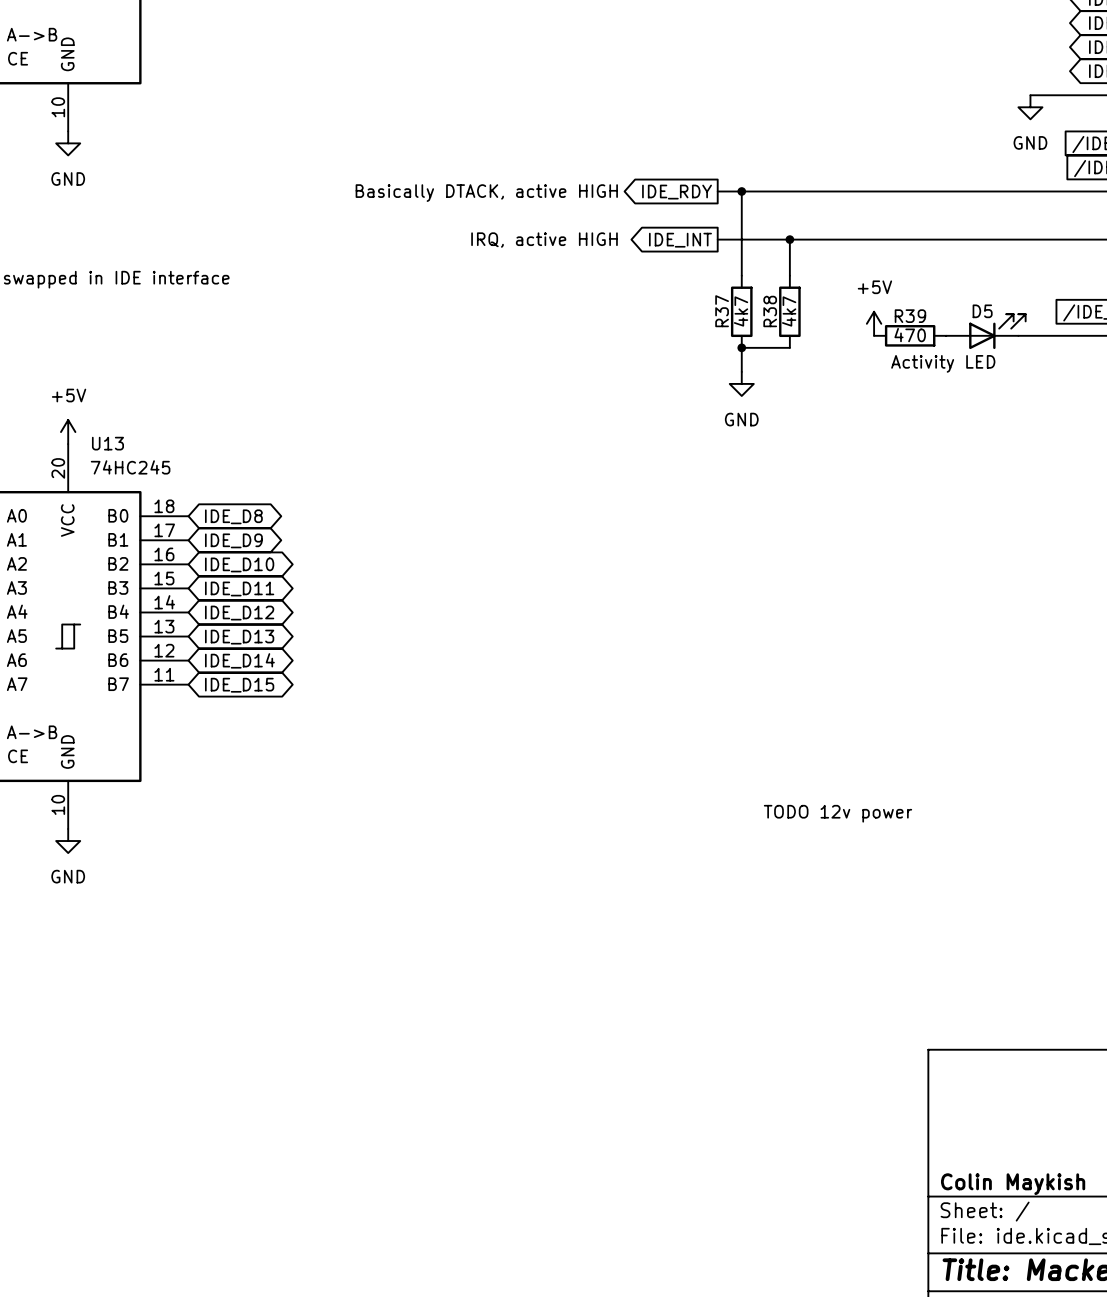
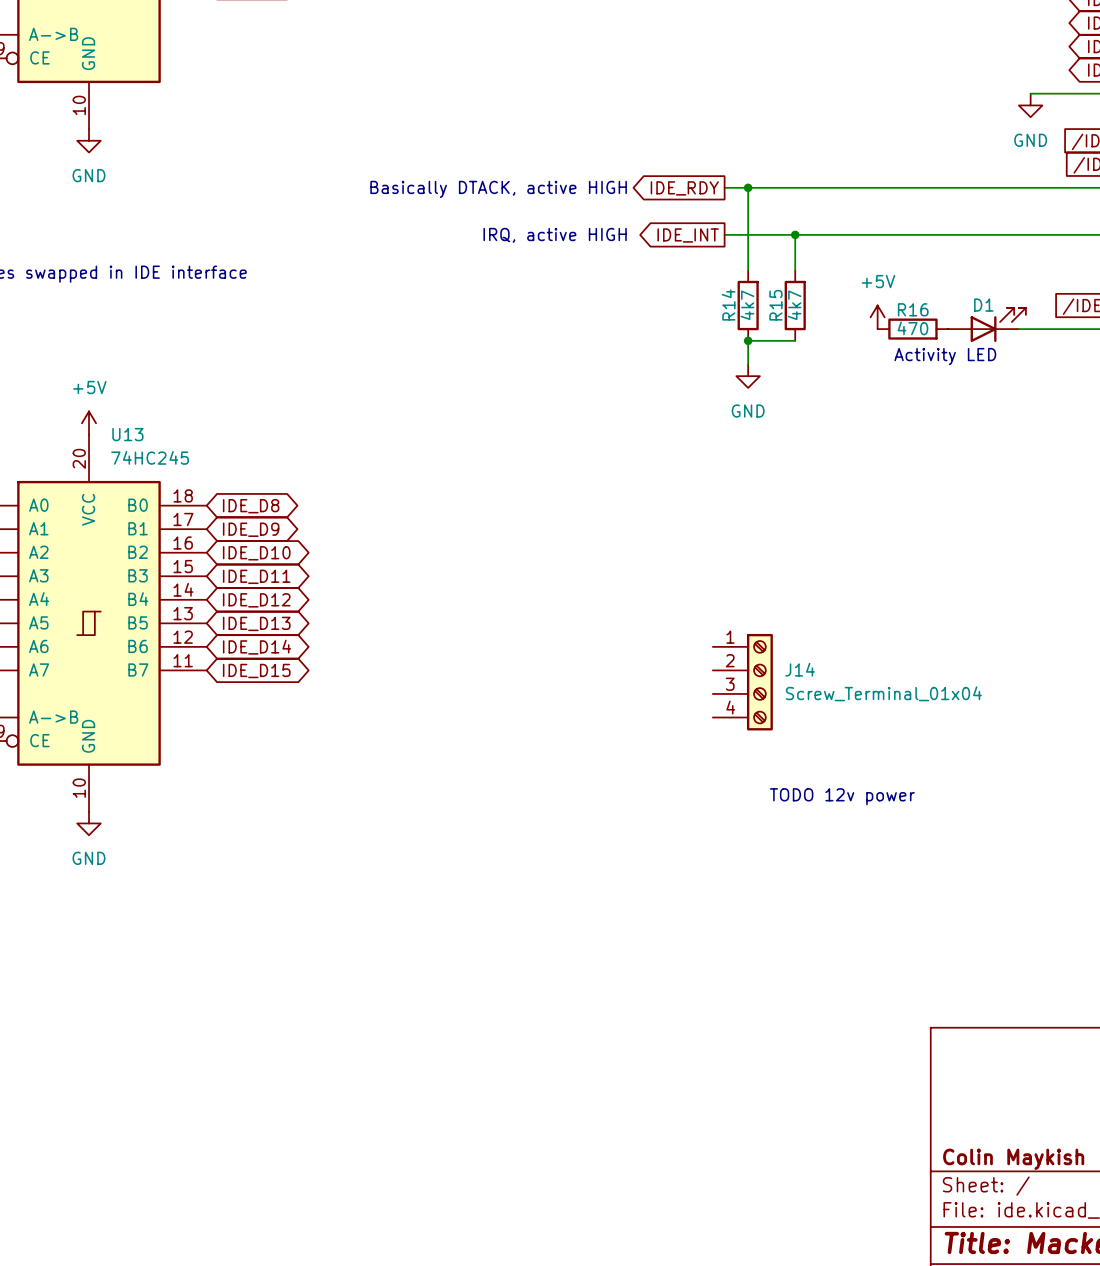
R37 name: R37 (722, 311) -> R14 (728, 304)
R38 name: R38 (770, 311) -> R15 (775, 305)
D5 name: D5 (982, 311) -> D1 (983, 305)
R39 name: R39 (910, 316) -> R16 (913, 309)
J14: none -> Screw_Terminal_01x04 (742, 682)

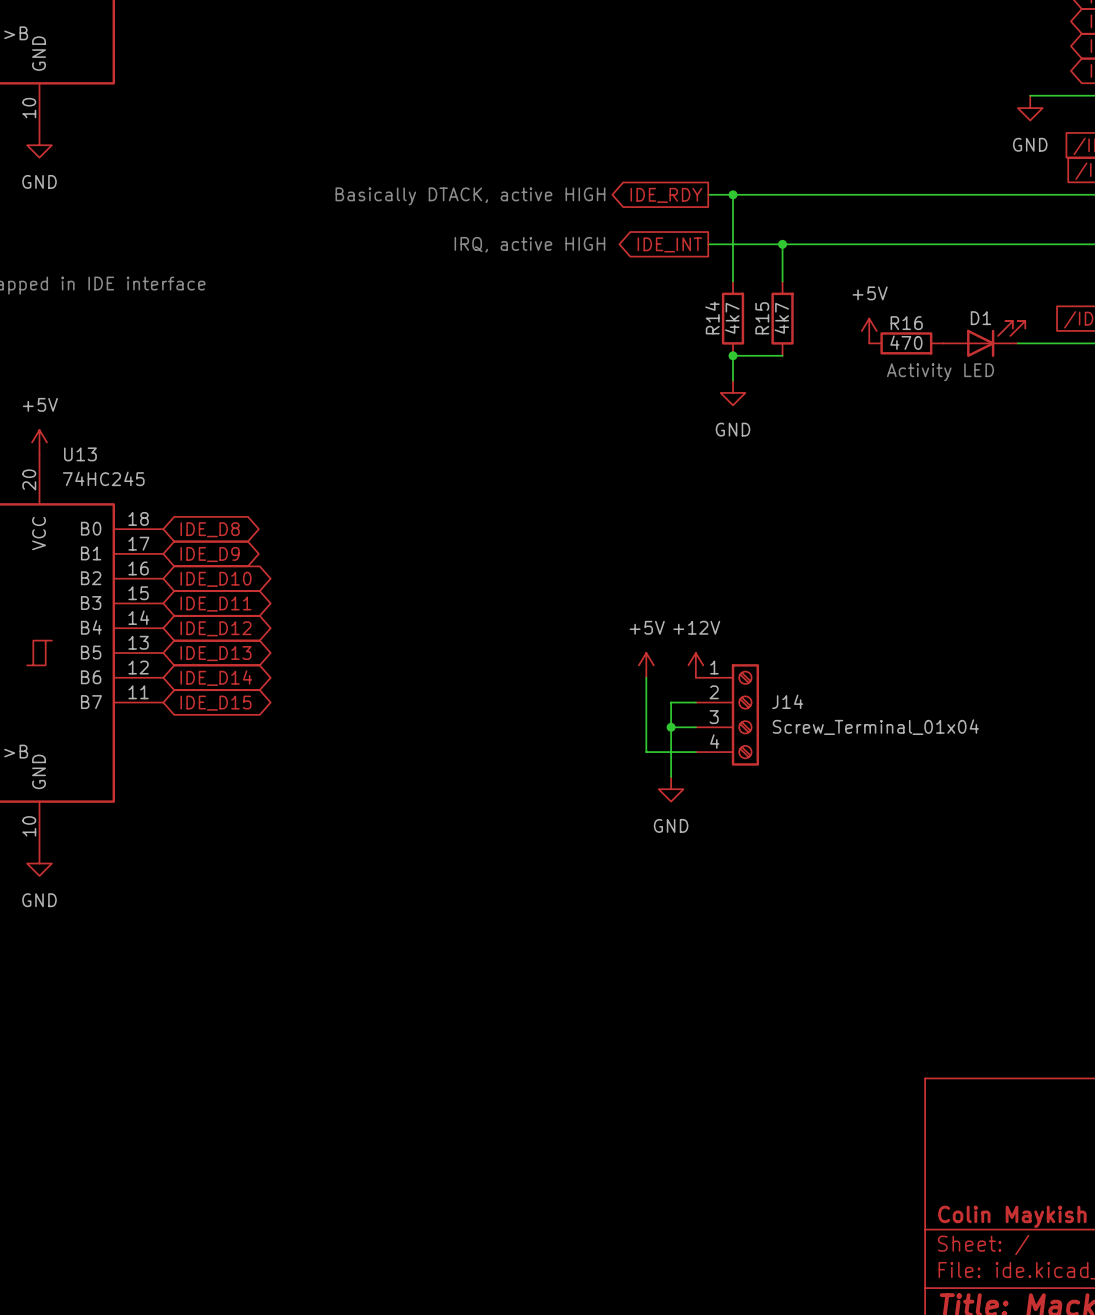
power symbol: none -> +5V (646, 665)
power symbol: none -> +12V (695, 665)
wire: none -> (646, 677) (646, 752) (695, 752)
wire: none -> (695, 702) (671, 702) (671, 776)
wire: none -> (671, 727) (695, 727)
junction: none -> (671, 727)
power symbol: none -> GND (671, 789)
text: TODO 12v power (842, 796) -> none

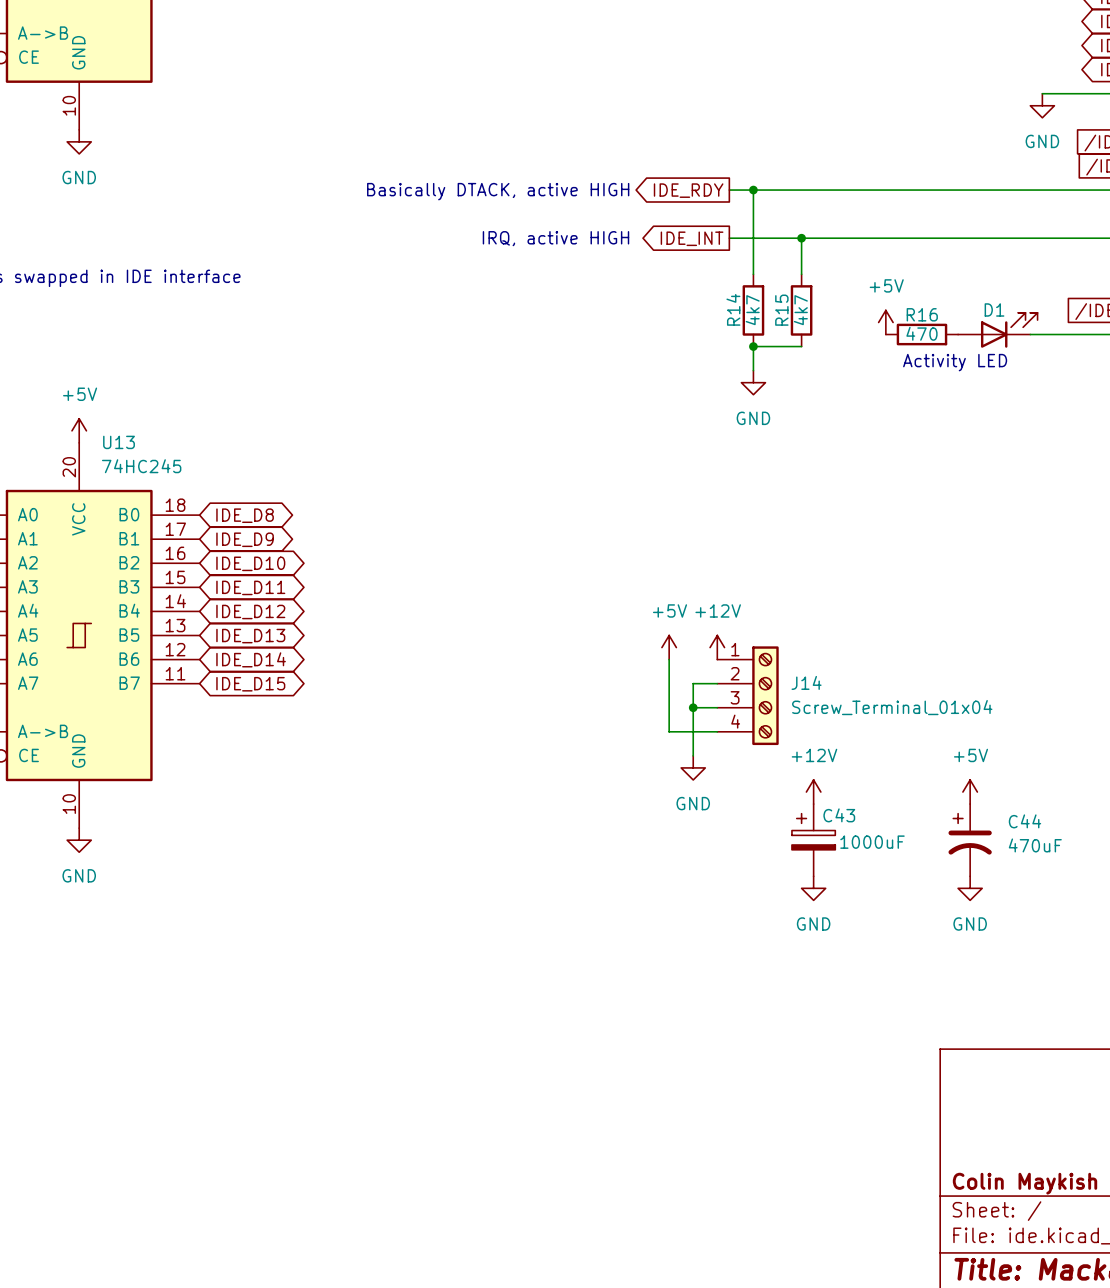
power symbol: none -> +12V (813, 792)
power symbol: none -> +5V (970, 792)
C43: none -> 1000uF (813, 840)
C44: none -> 470uF (970, 840)
power symbol: none -> GND (813, 888)
power symbol: none -> GND (970, 888)

